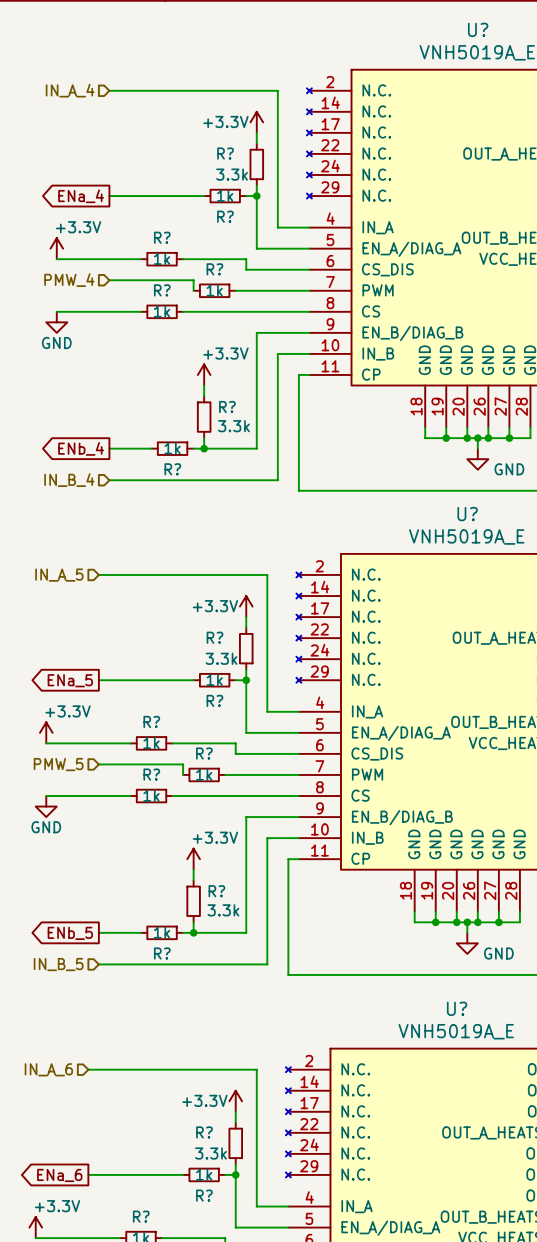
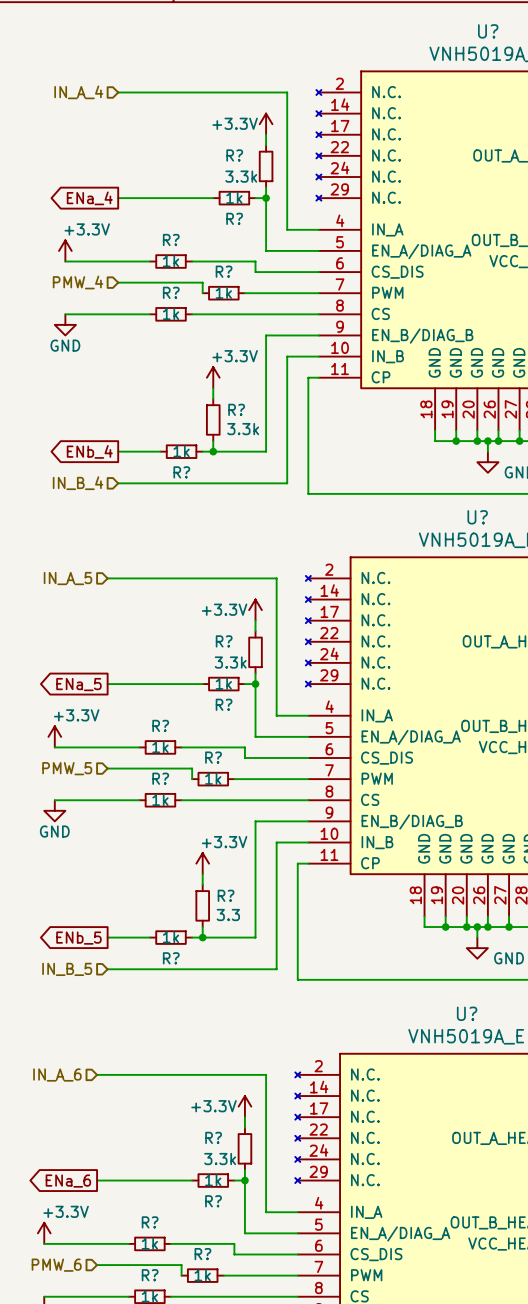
R? value: 3.3k (223, 910) -> 3.3 (228, 915)

